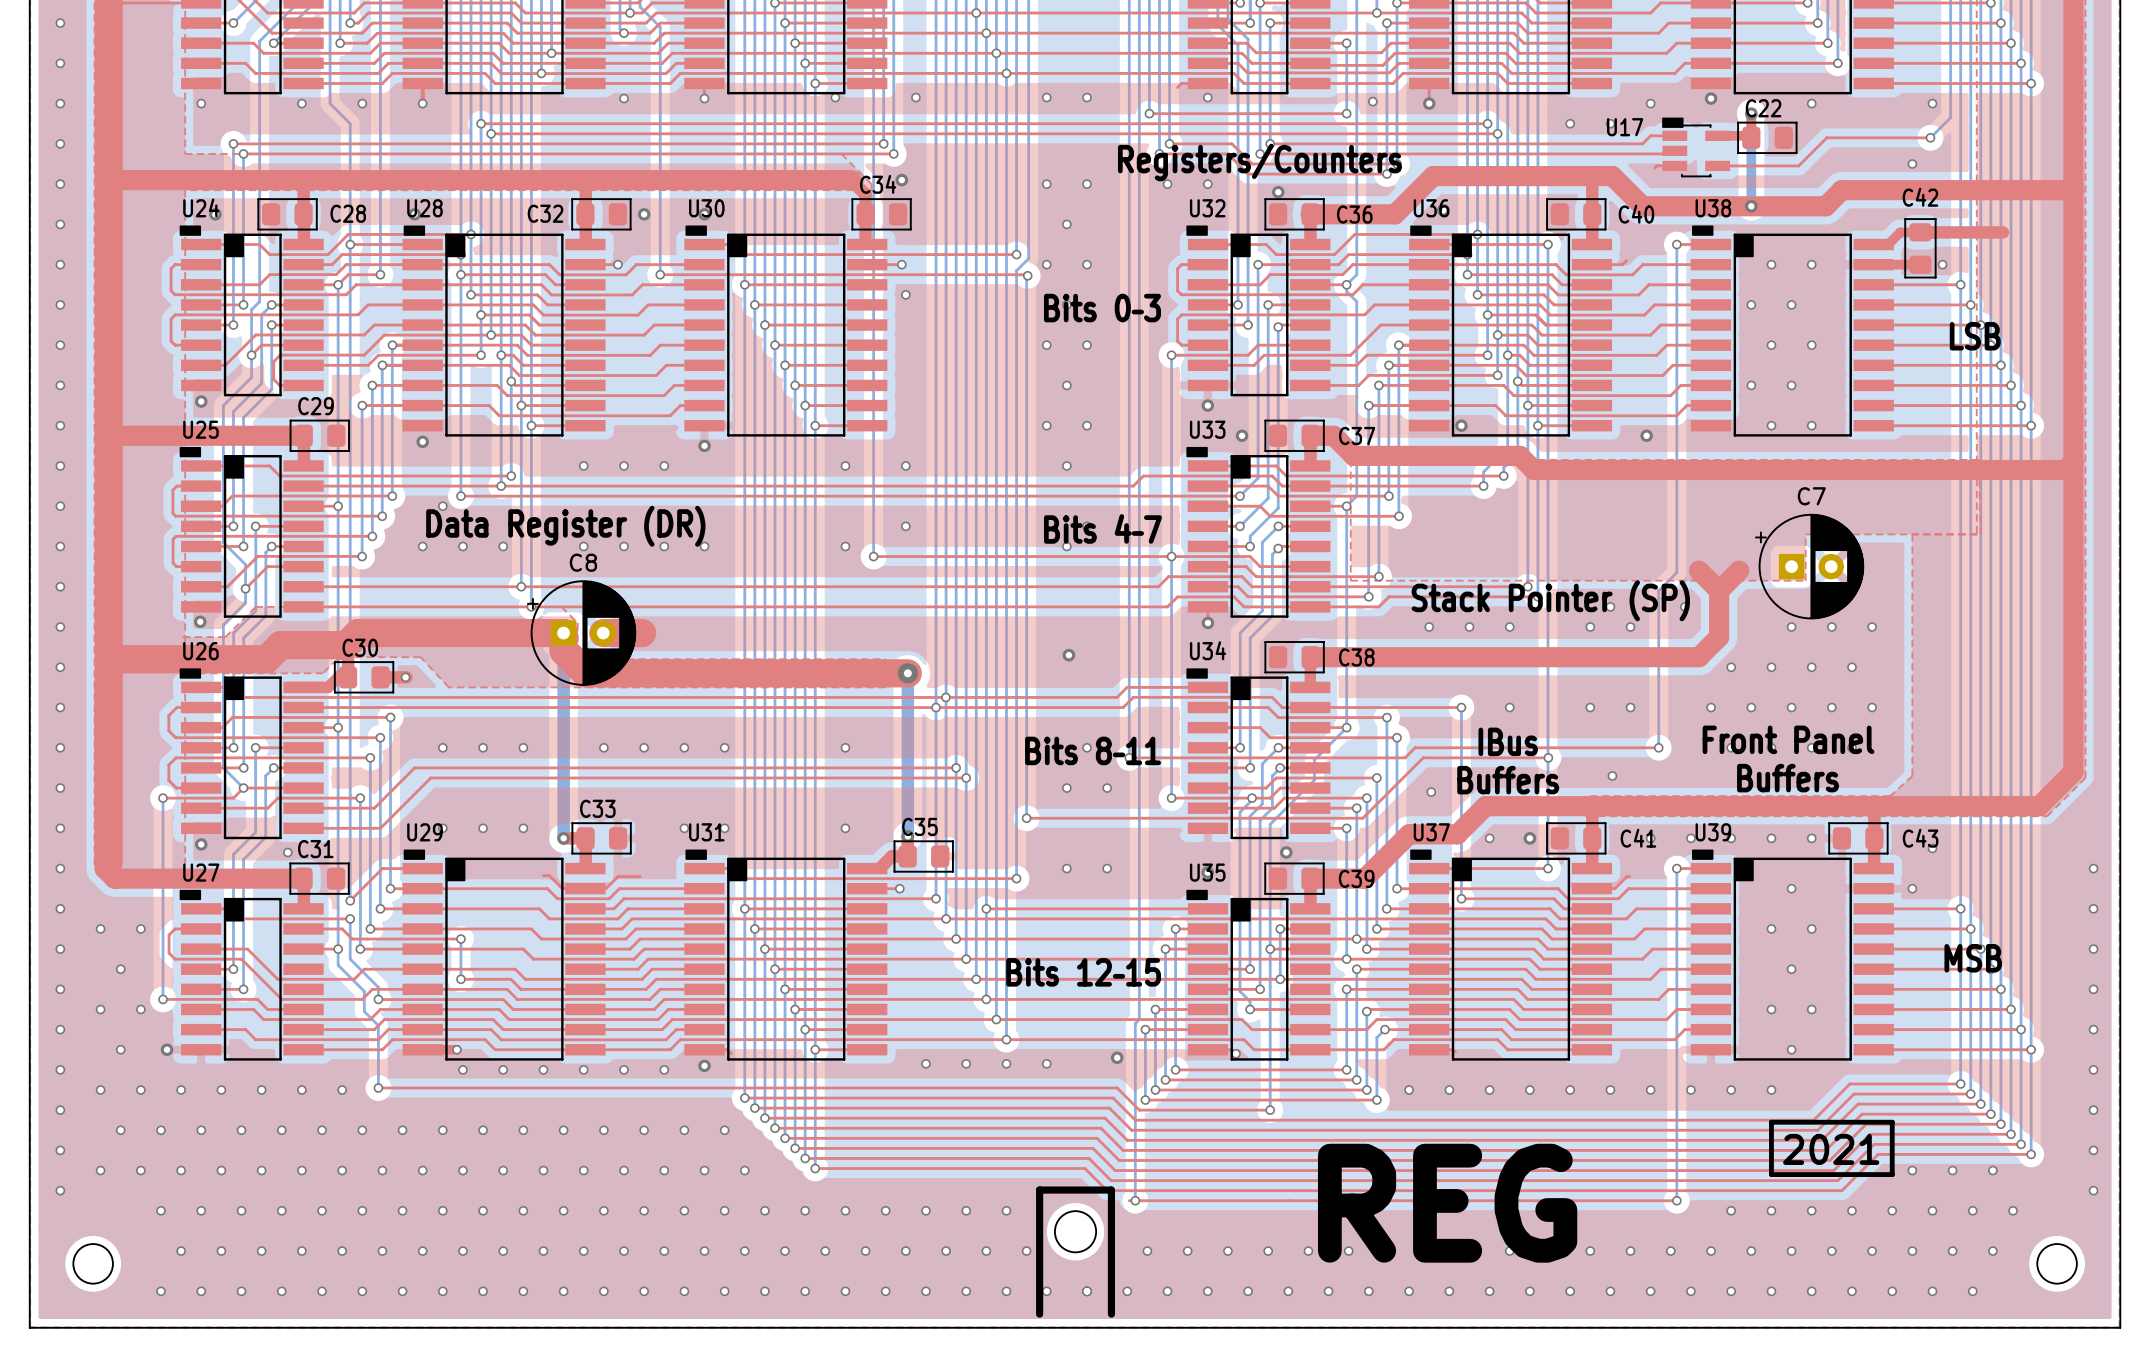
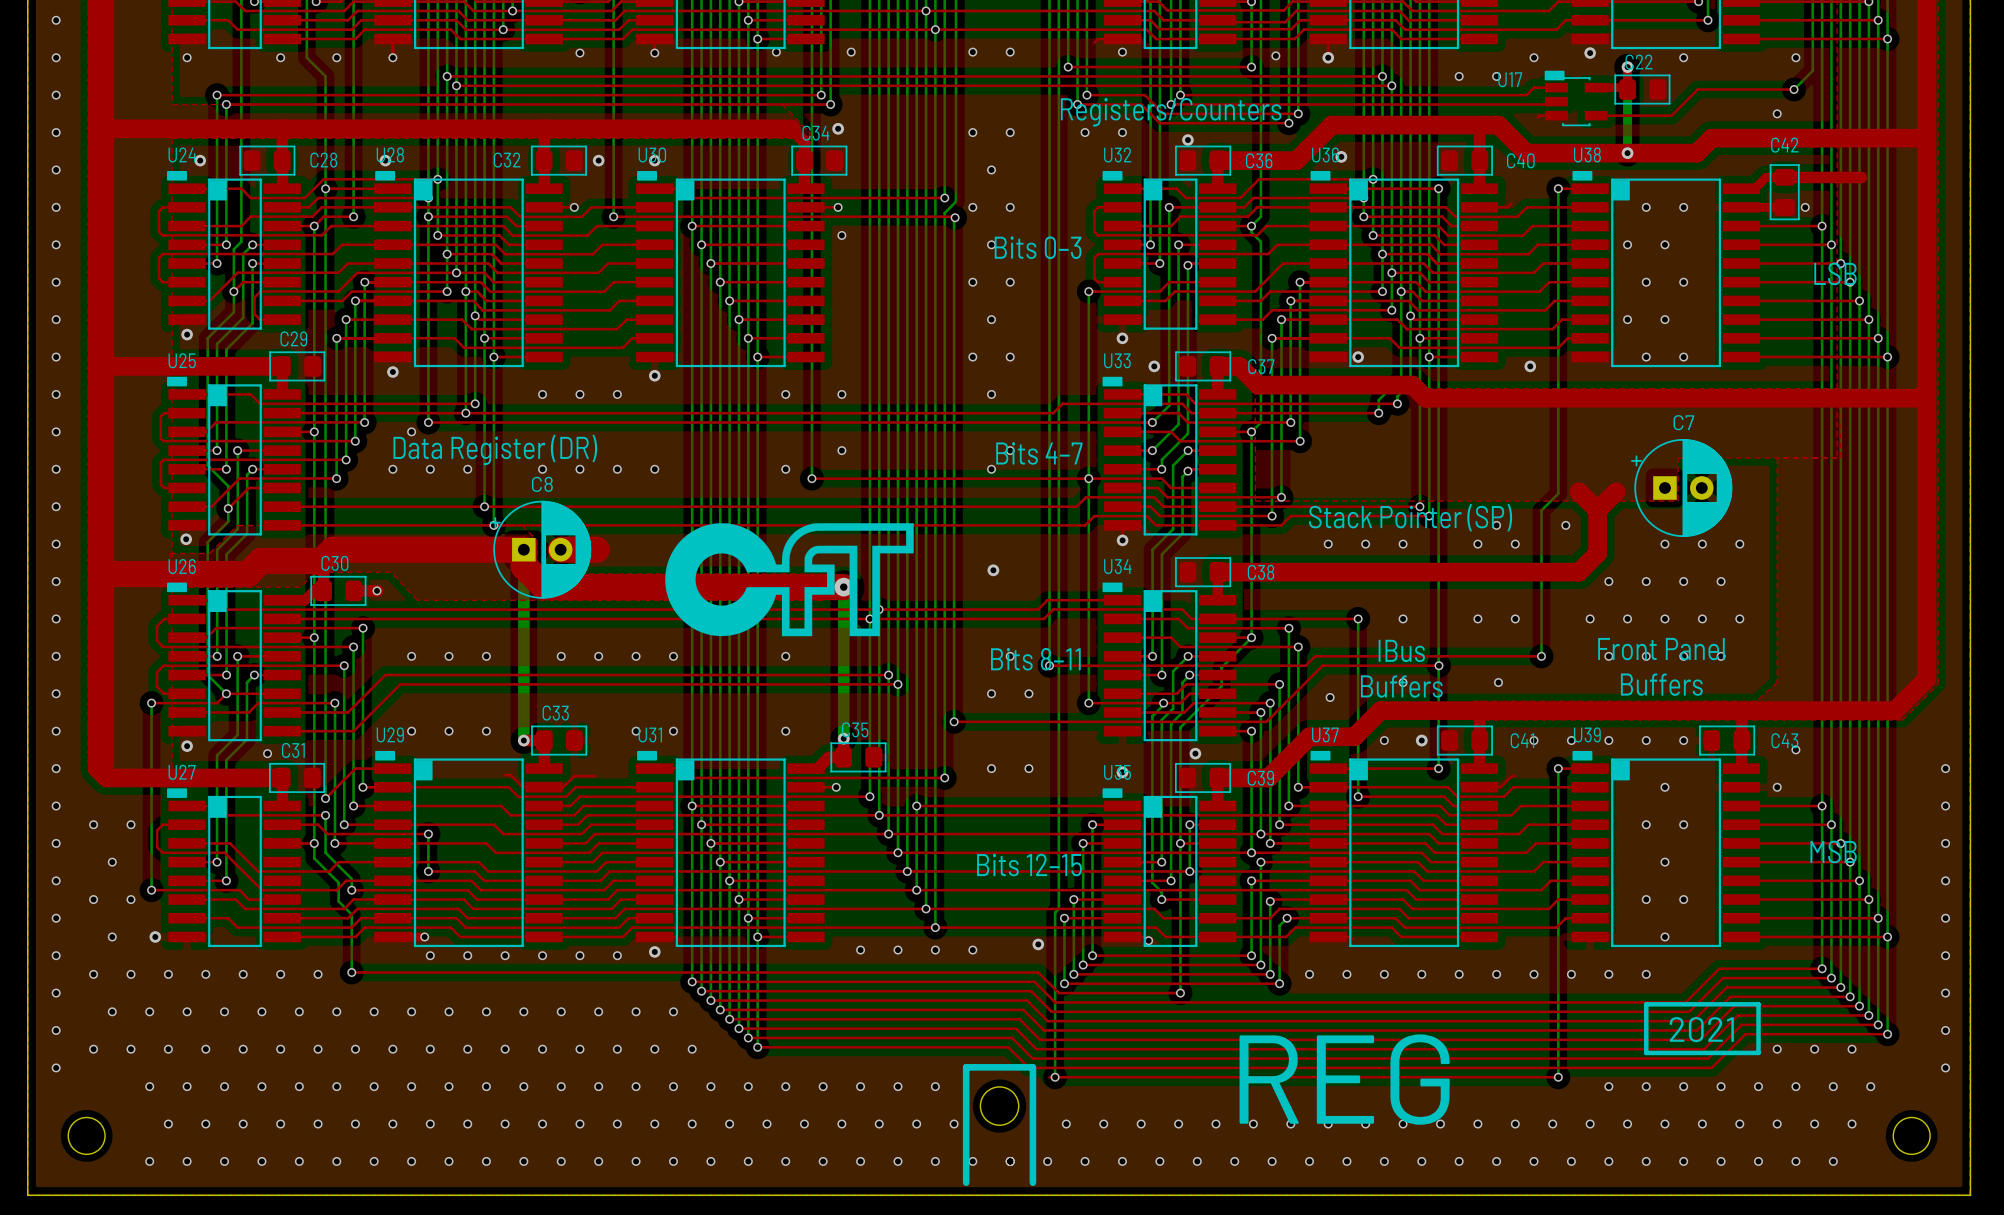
drawing: none -> [665, 523, 914, 637]

